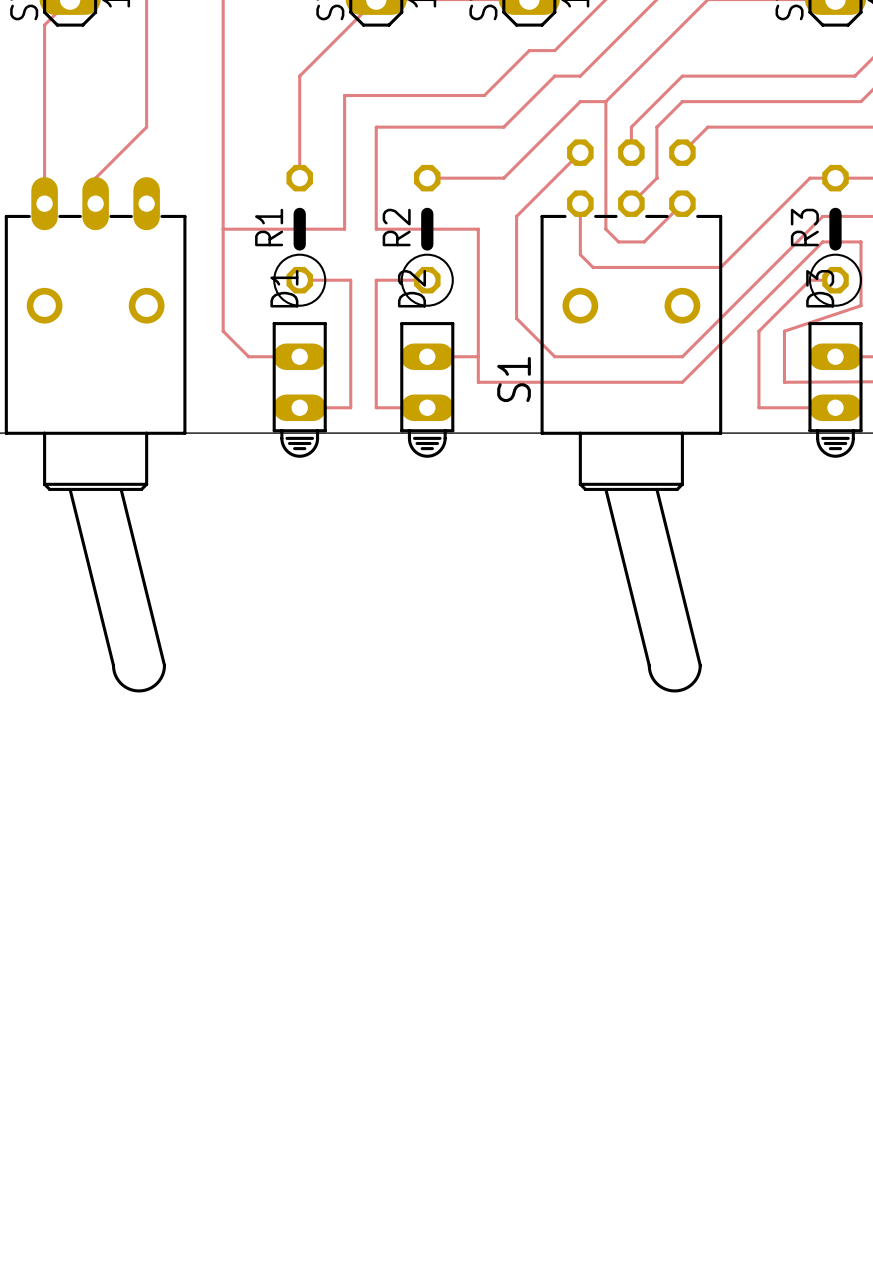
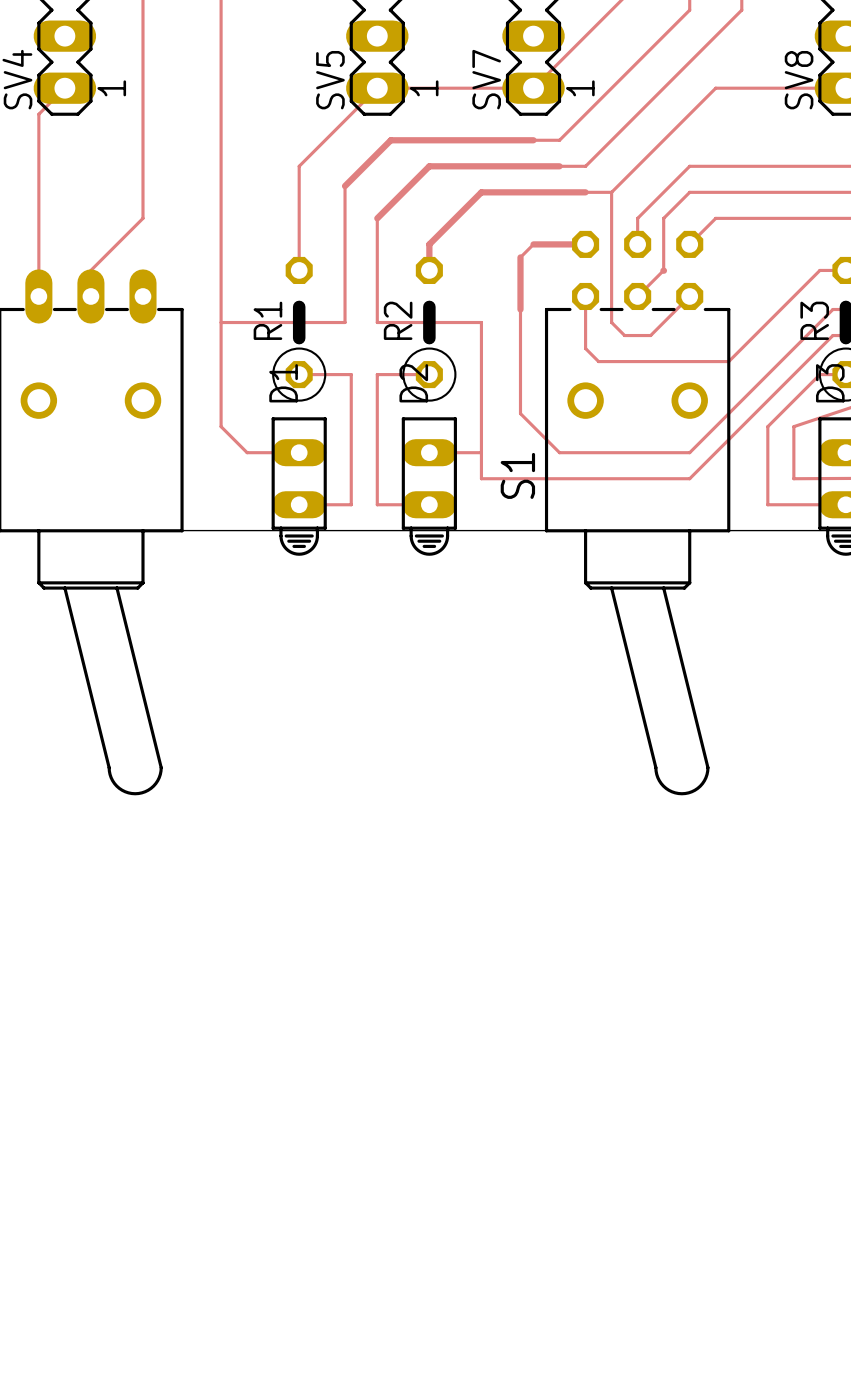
track: (529, 50) (484, 95) (344, 95) -> (533, 140) (390, 140) (345, 186)
track: (554, 76) (503, 127) (376, 127) -> (559, 166) (429, 166) (377, 218)
track: (580, 101) (529, 152) -> (585, 244) (533, 244)
track: (580, 152) (516, 216) -> (520, 257) (520, 309)
track: (516, 165) (503, 178) (427, 178) -> (585, 192) (481, 192) (429, 244) (429, 270)

